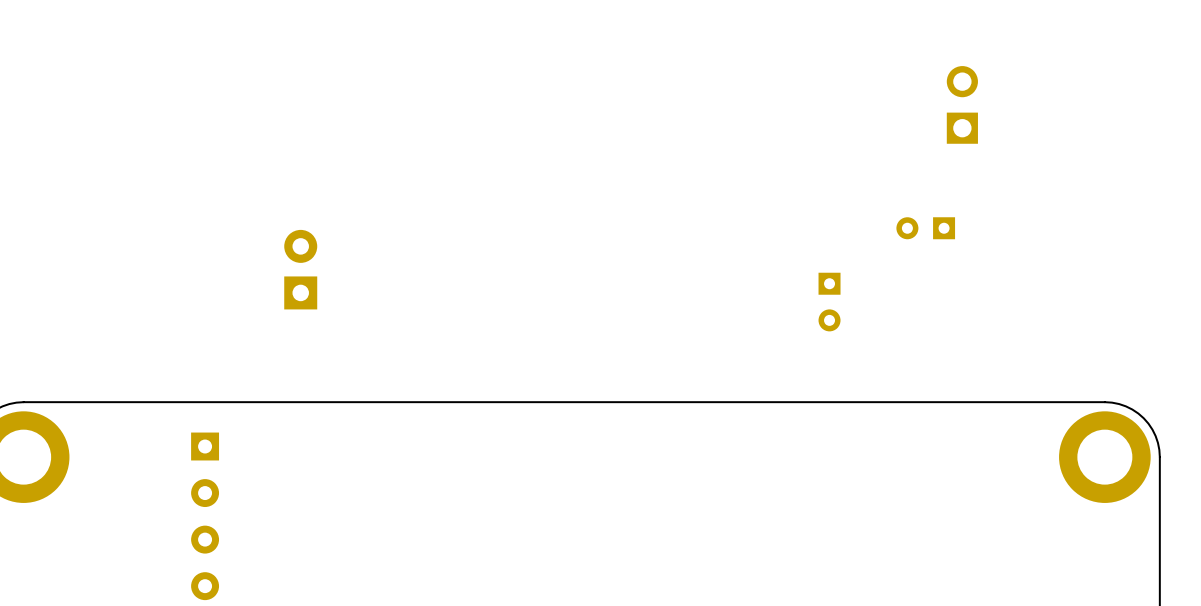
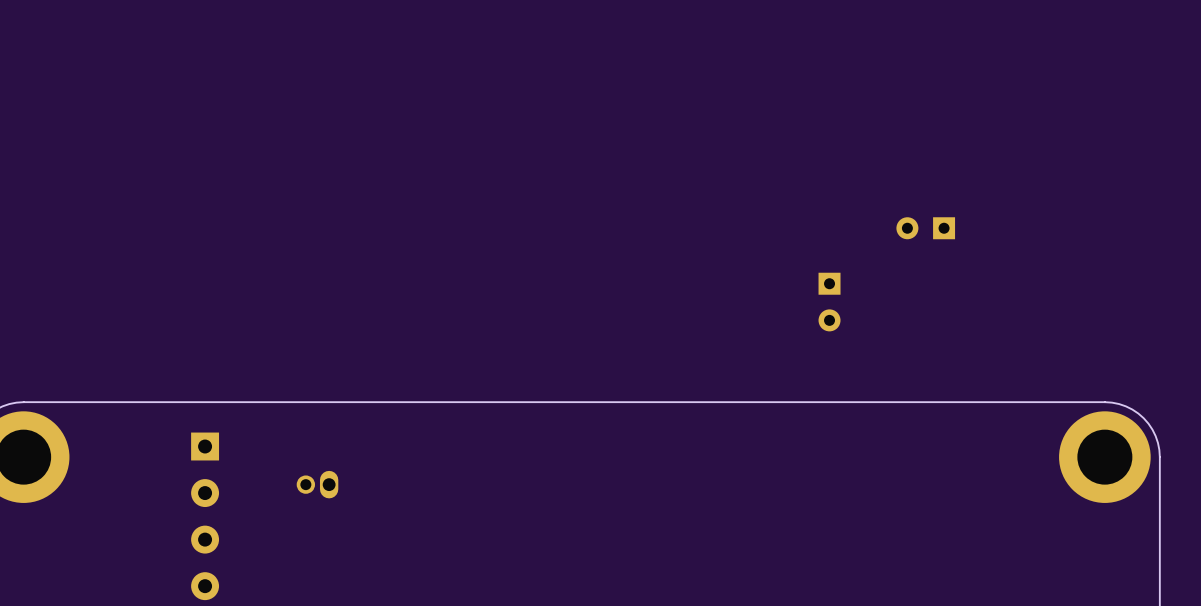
part: (962, 104) -> none
part: (300, 269) -> none
part: none -> (317, 484)

